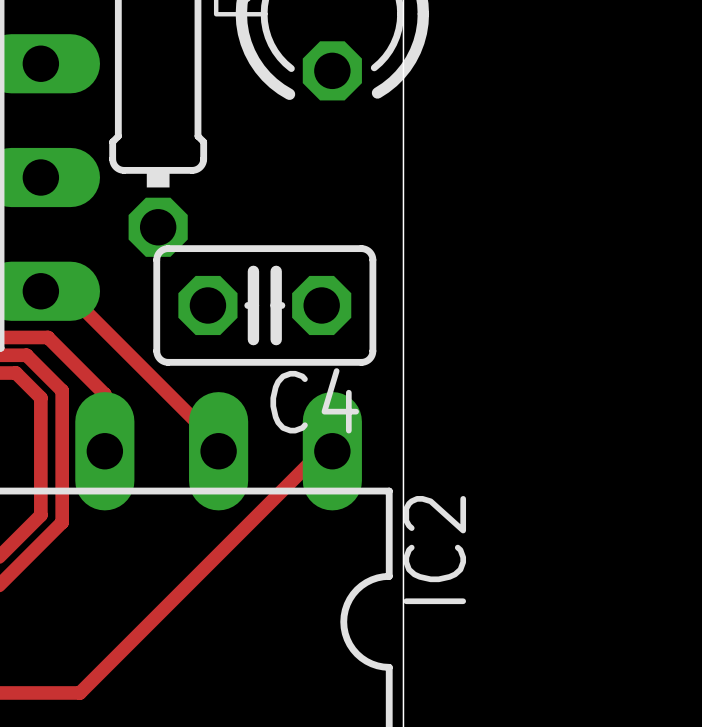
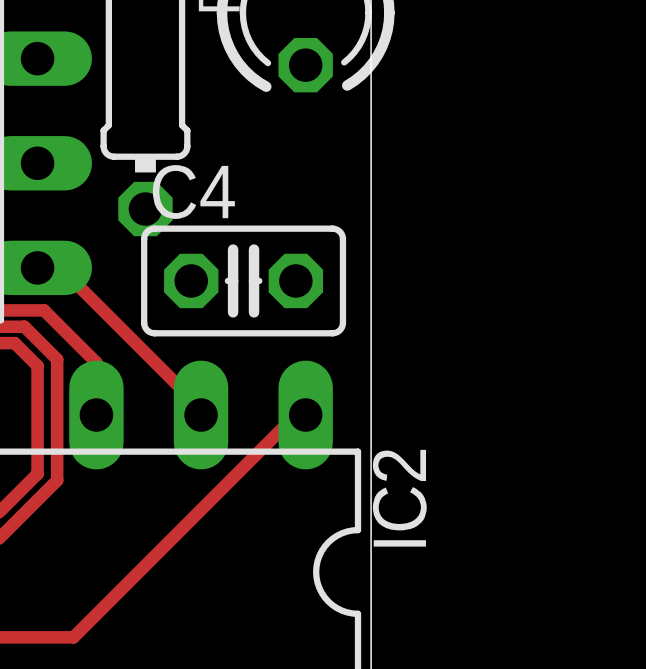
C4 name position: C4 (314, 400) -> C4 (193, 192)

